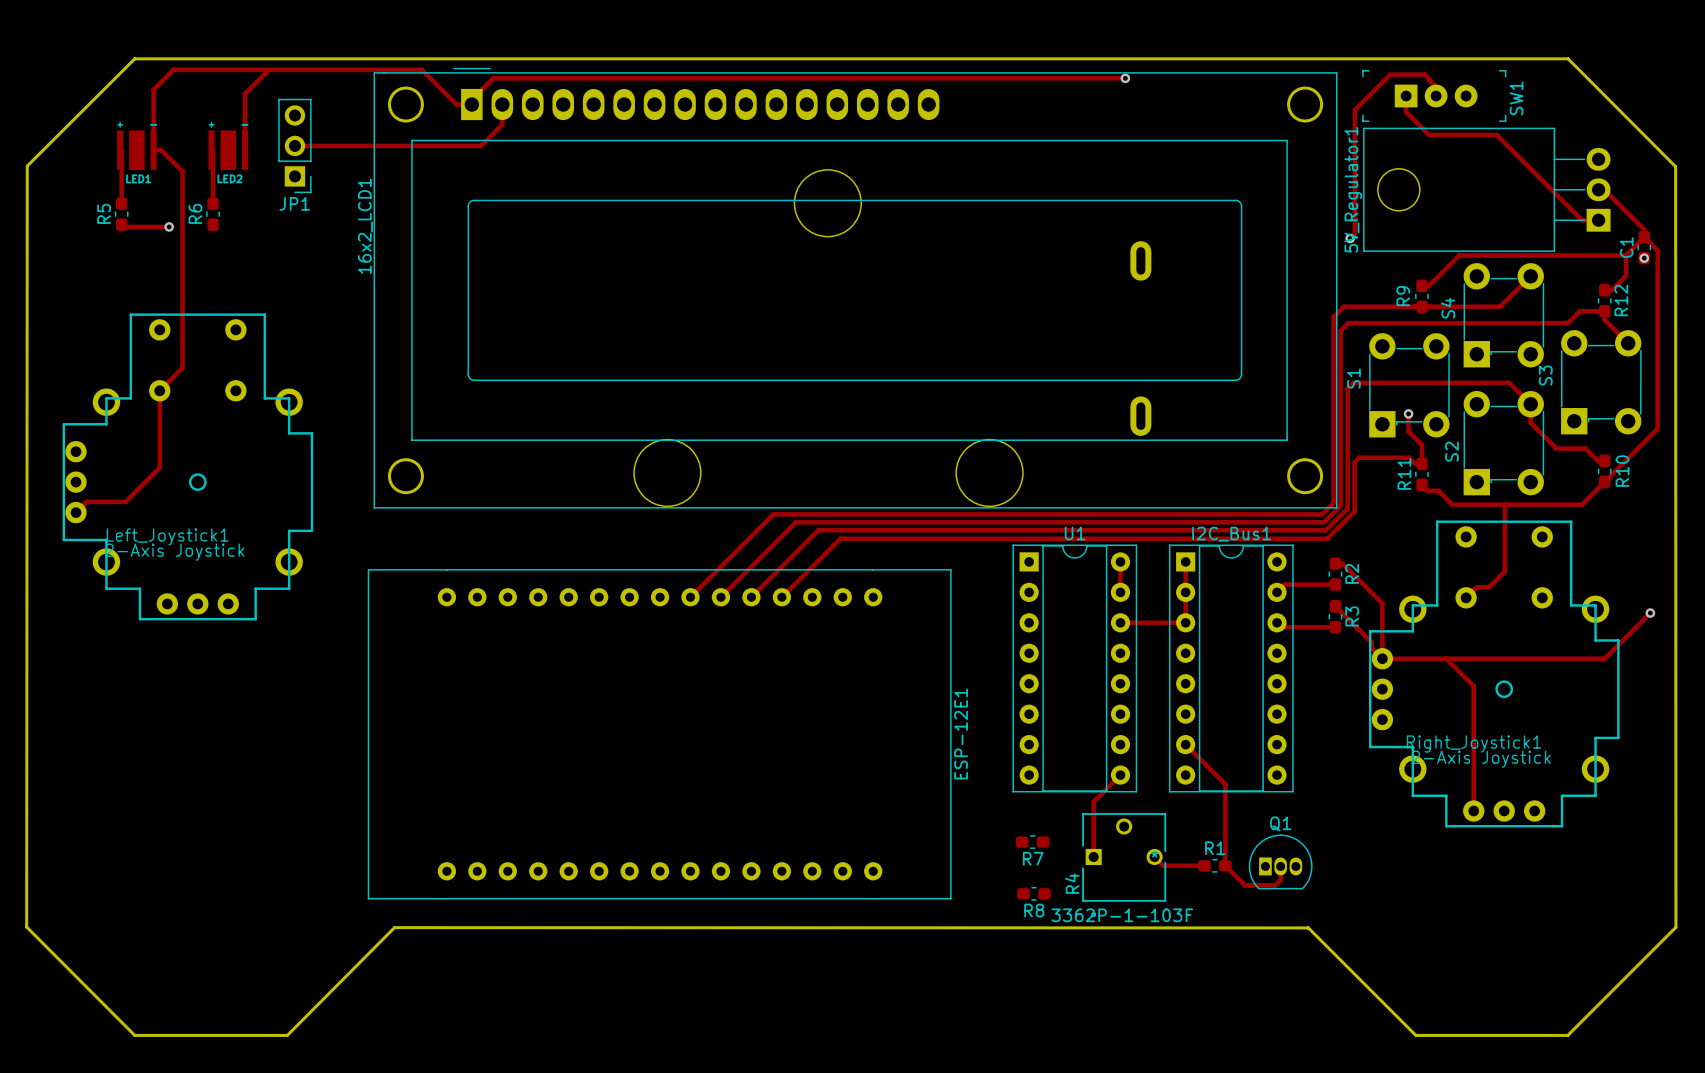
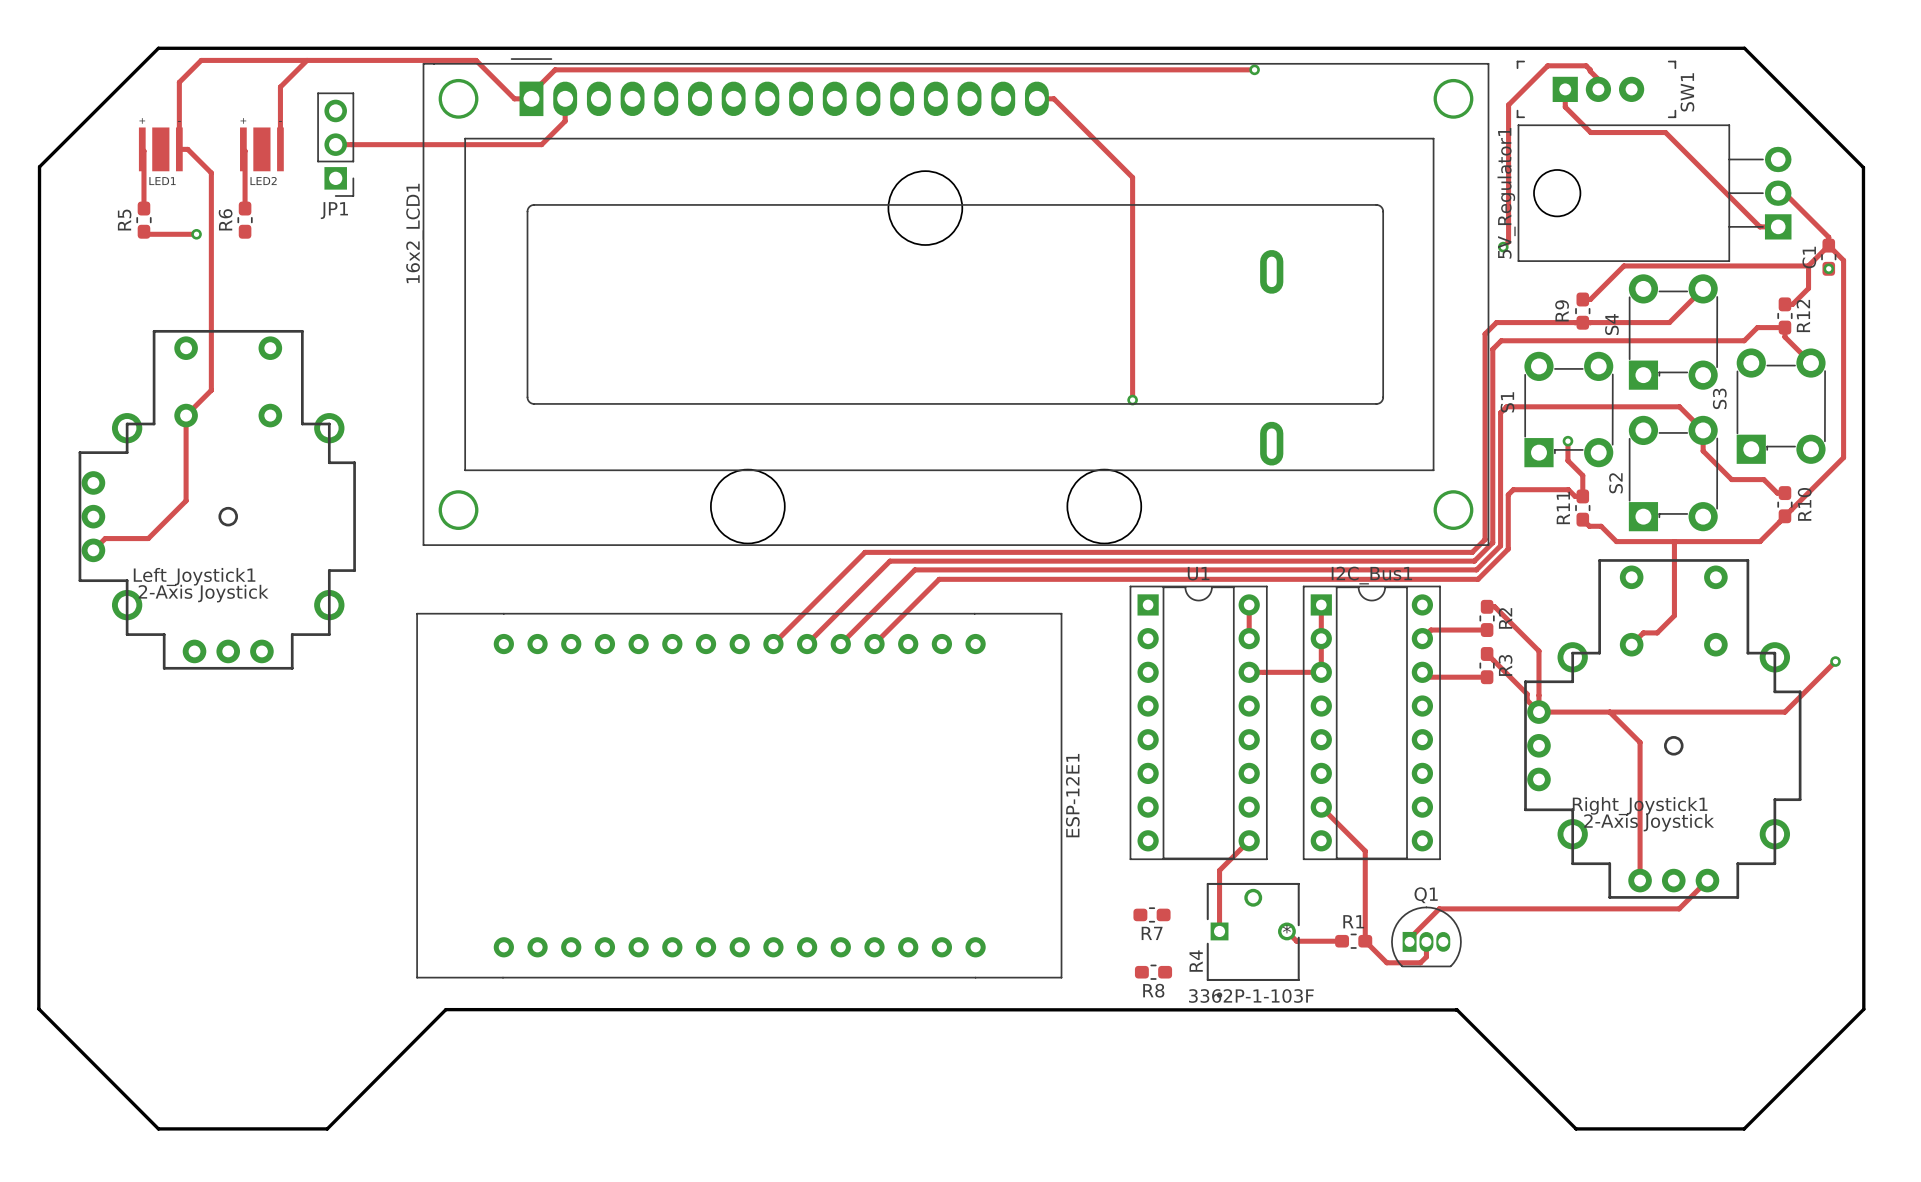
track: none -> (1036, 98) (1053, 98) (1132, 177) (1132, 400)
via: none -> (1132, 400)
track: none -> (1707, 880) (1679, 908) (1439, 908) (1409, 938) (1409, 941)

